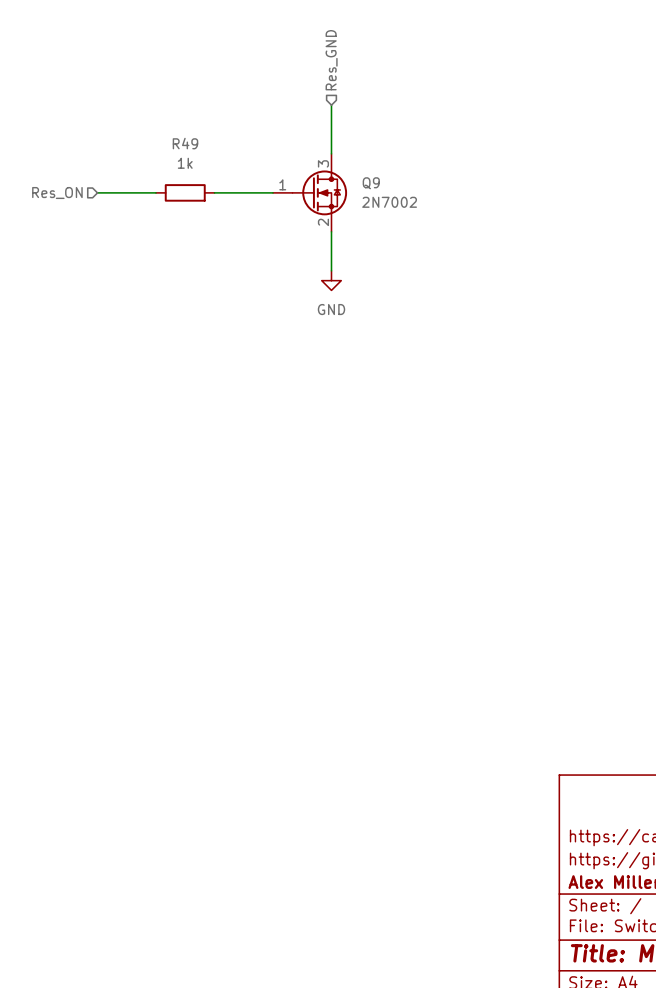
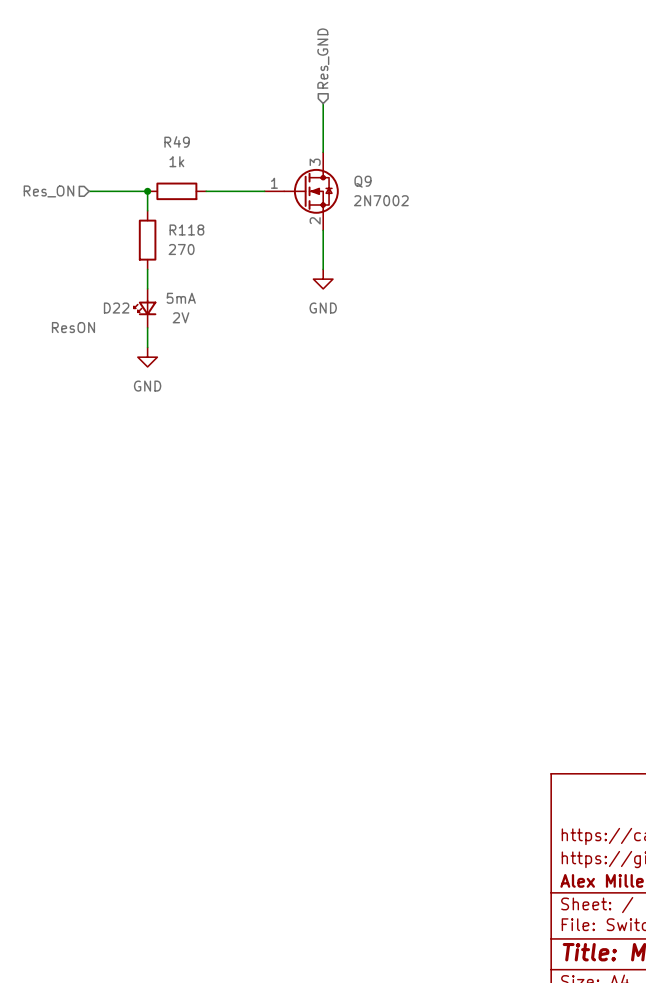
wire: none -> (147, 191) (147, 210)
junction: none -> (147, 191)
R118: none -> 270 (147, 240)
wire: none -> (147, 269) (147, 288)
D22: none -> ResON (145, 308)
wire: none -> (147, 327) (147, 347)
power symbol: none -> GND (147, 357)

